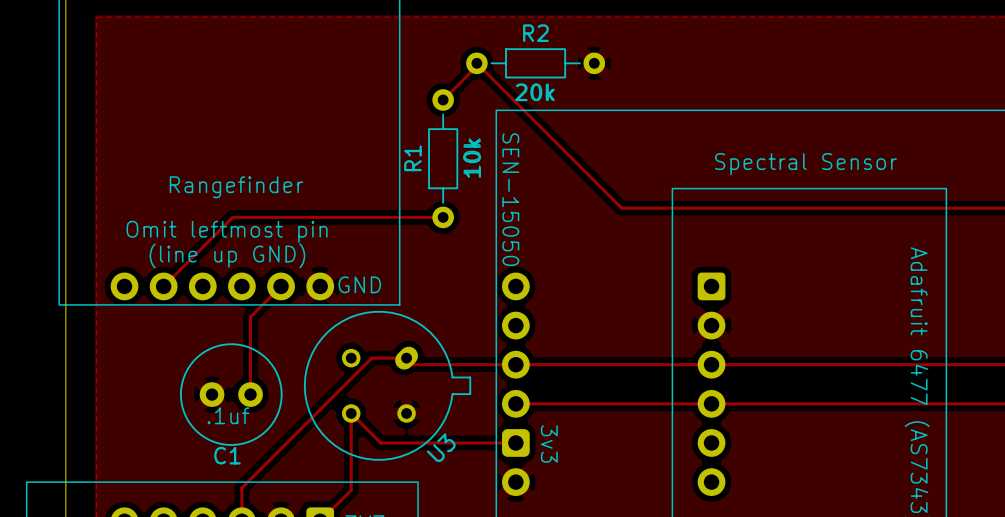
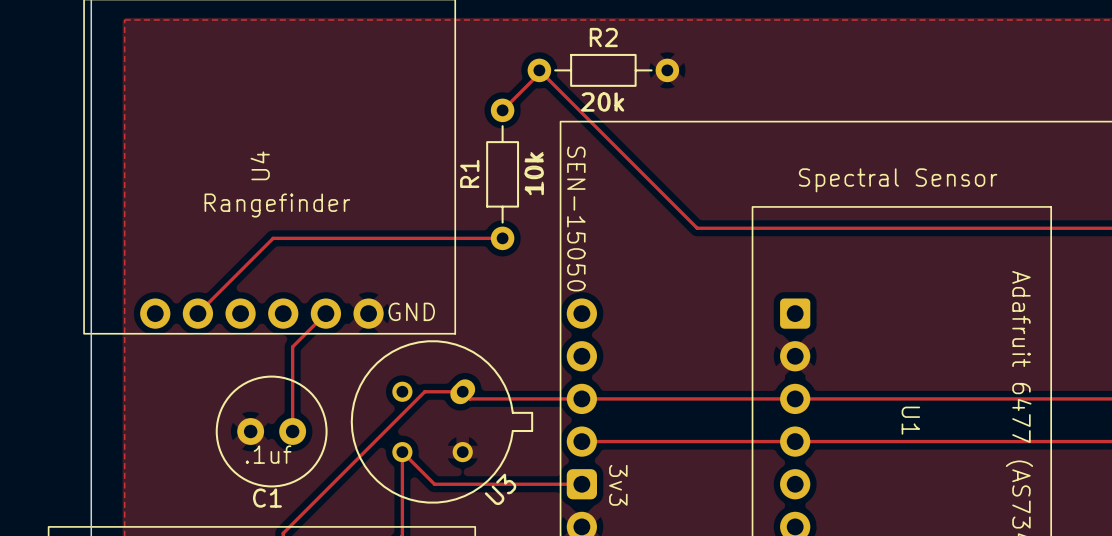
U4 name: none -> U4 (260, 165)
text: Omit leftmost pin (227, 231) -> none
text: (line up GND) (227, 255) -> none
U1 name: none -> U1 (910, 420)

